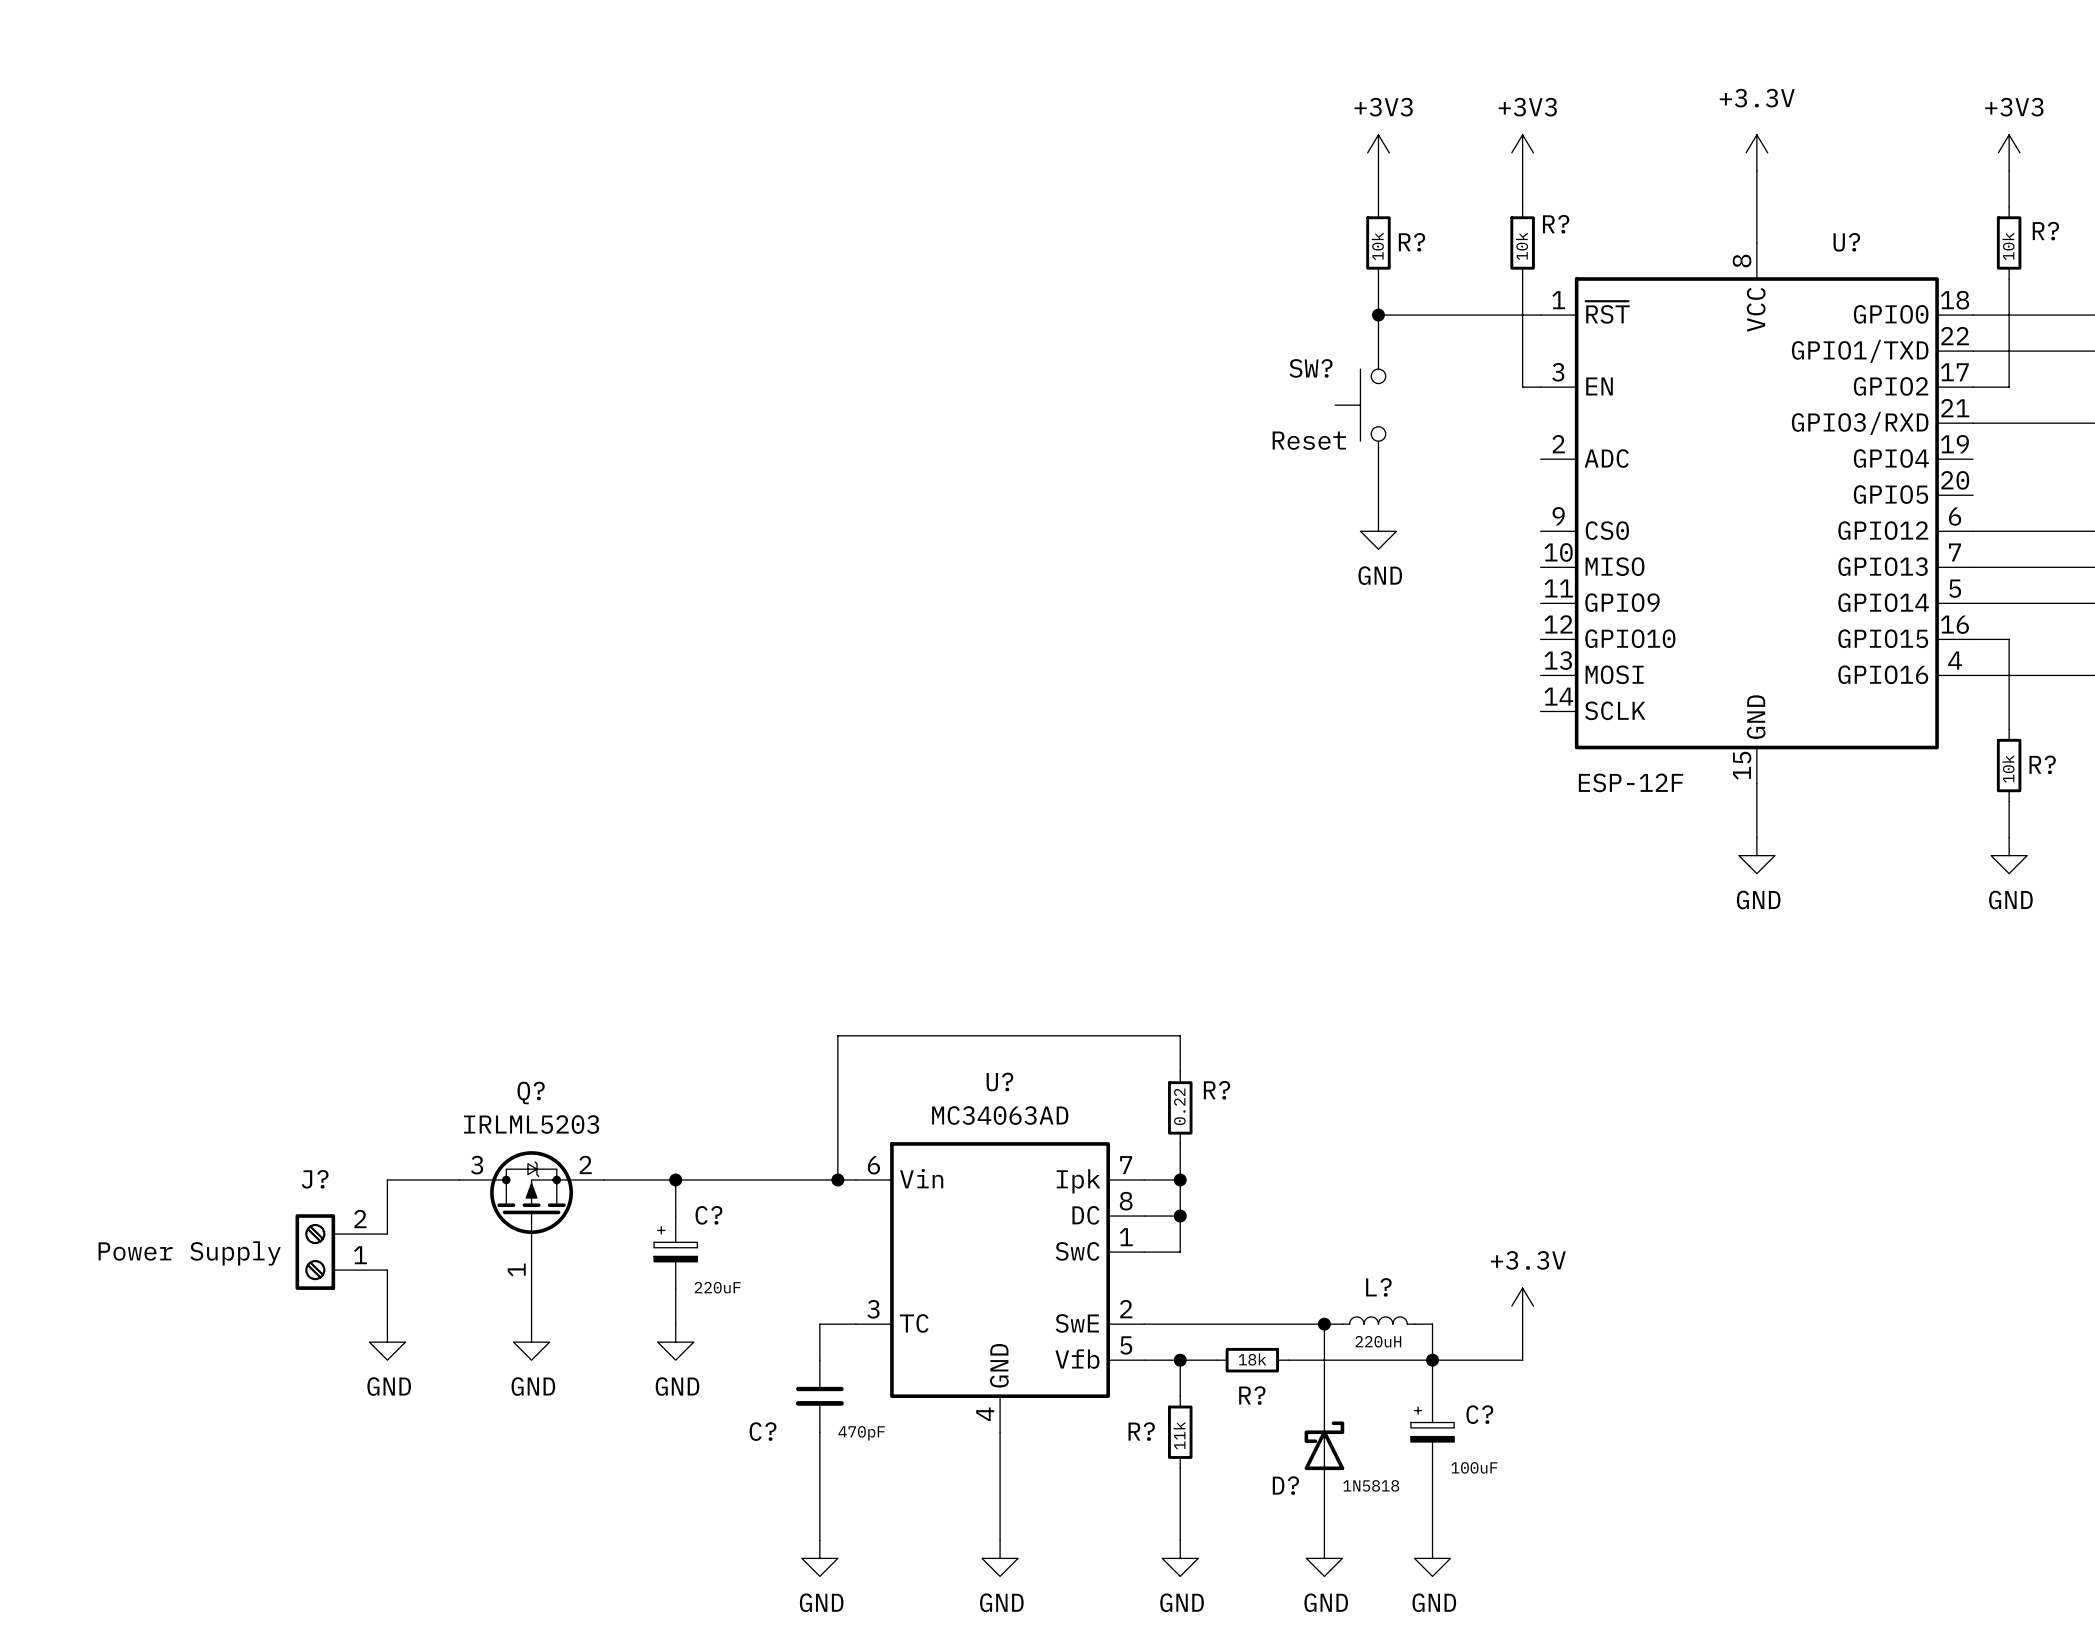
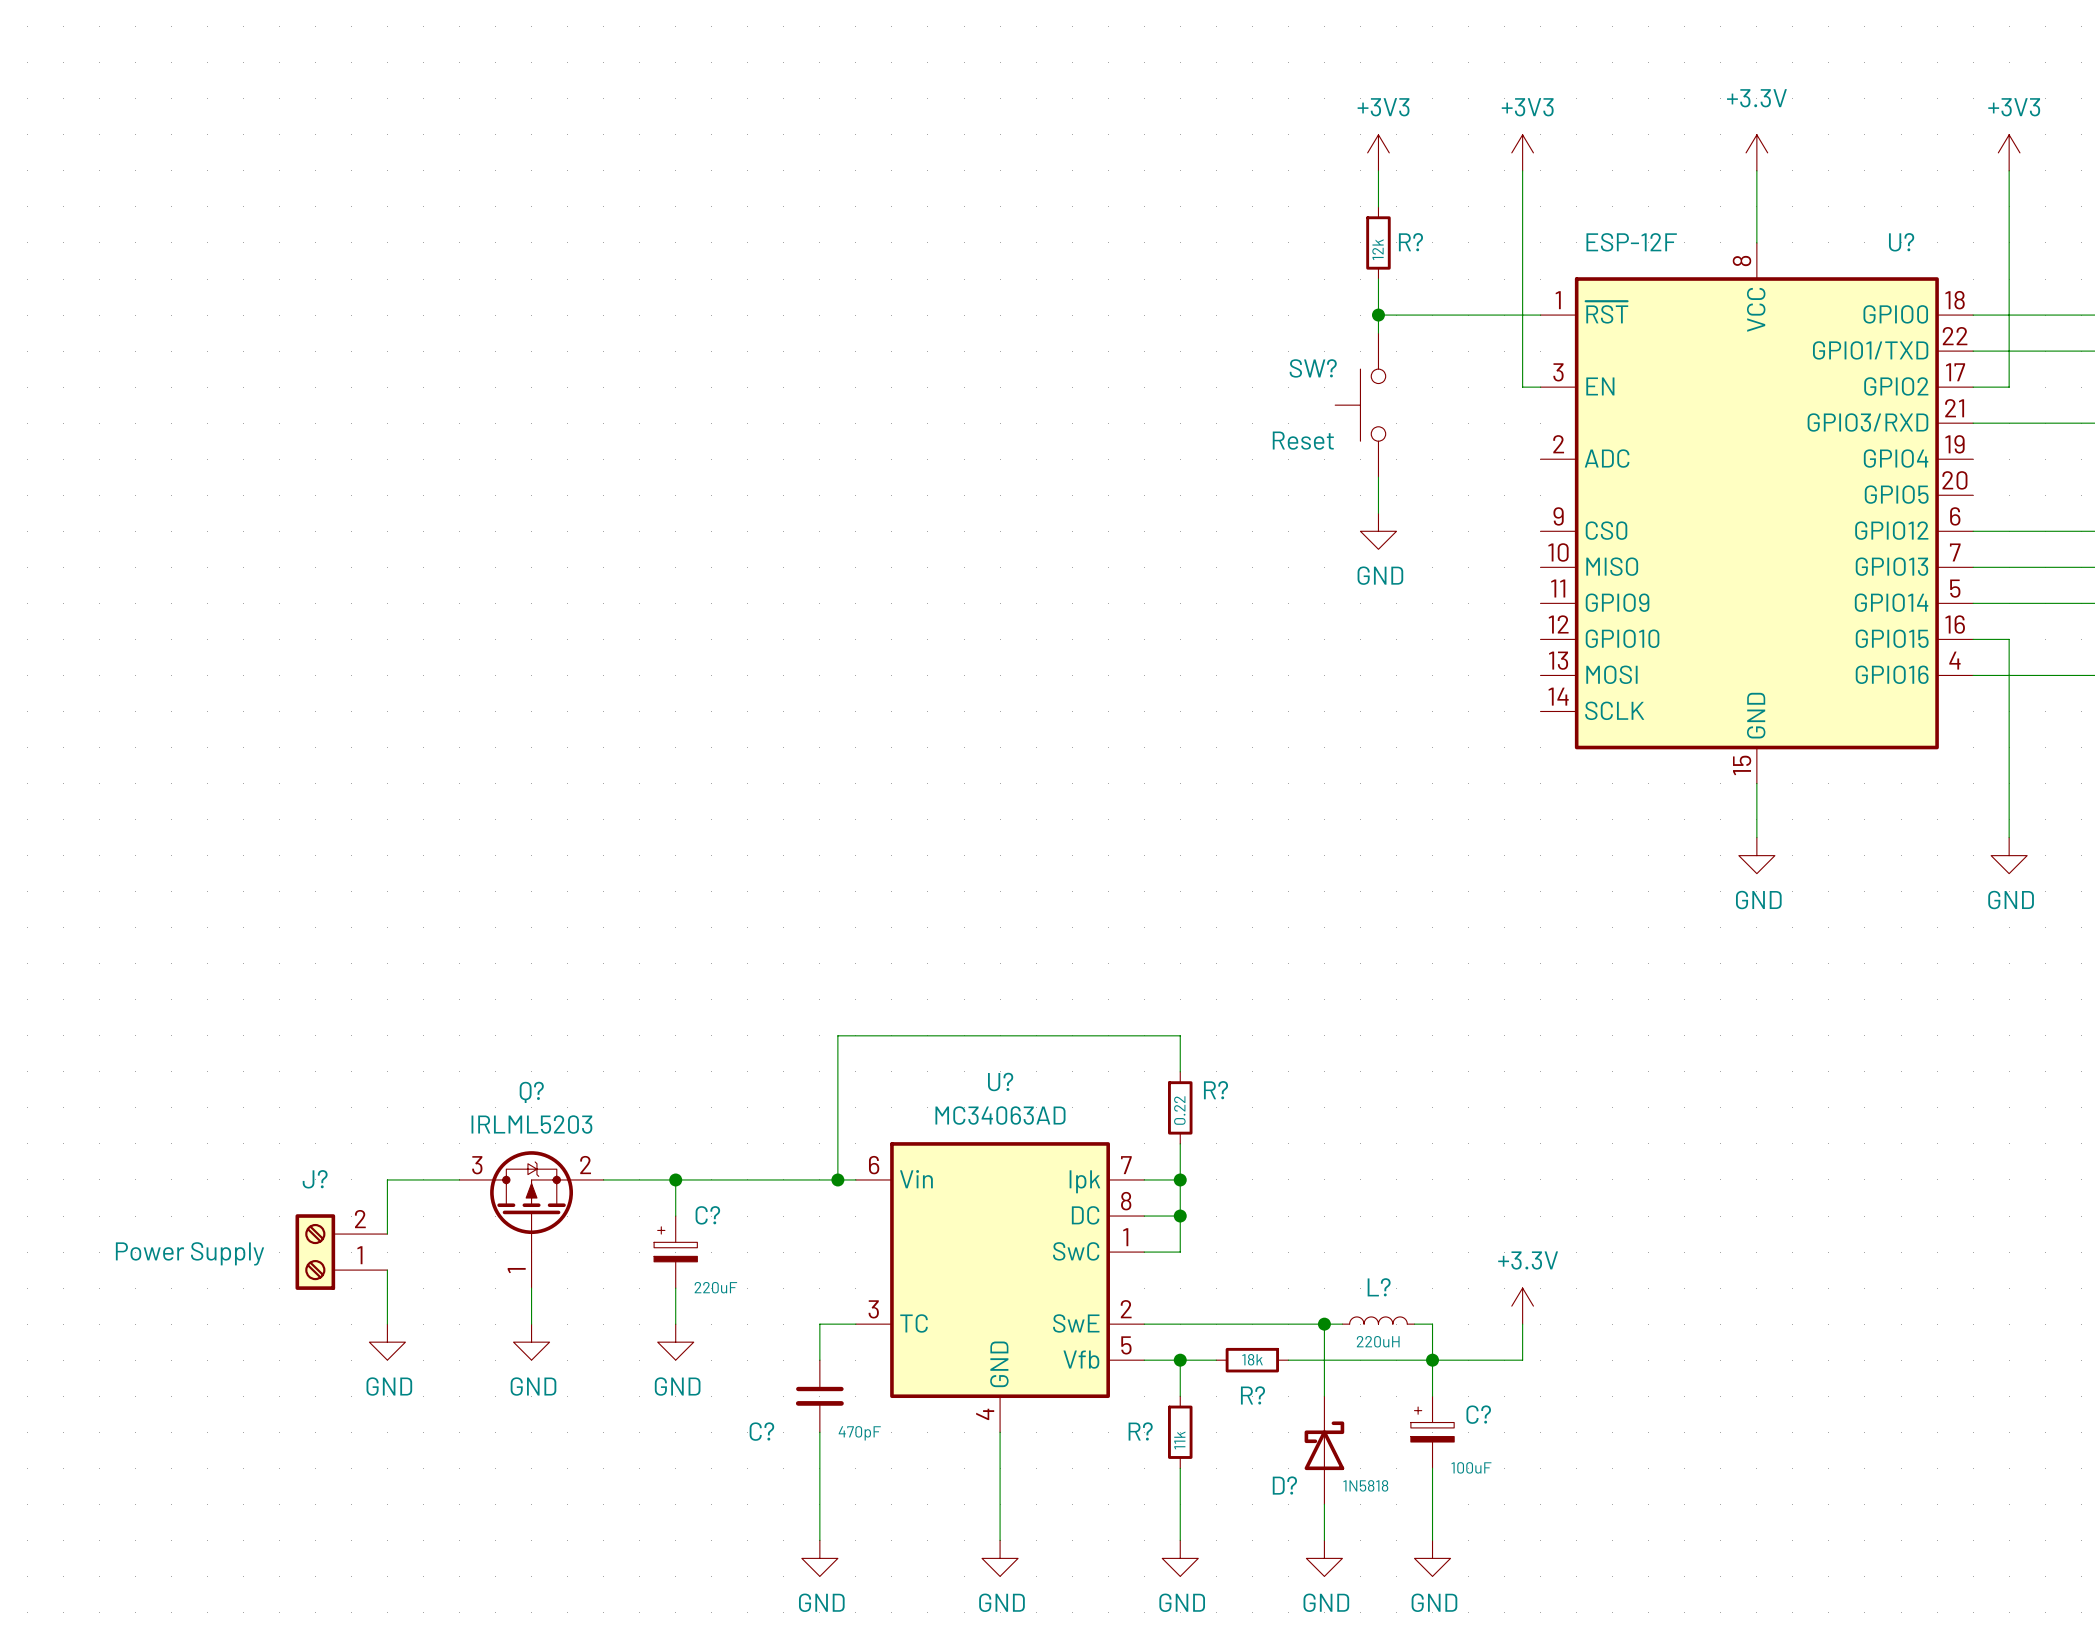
wire: none -> (1522, 206) (1522, 279)
wire: none -> (2009, 206) (2009, 279)
R?: 10k (1522, 242) -> none
U? name position: U? (1846, 242) -> U? (1901, 242)
R?: 10k (2009, 242) -> none
R? value: 10k (1377, 246) -> 12k (1377, 249)
wire: none -> (2009, 729) (2009, 801)
R?: 10k (2009, 765) -> none
U? value position: ESP-12F (1630, 782) -> ESP-12F (1631, 242)

